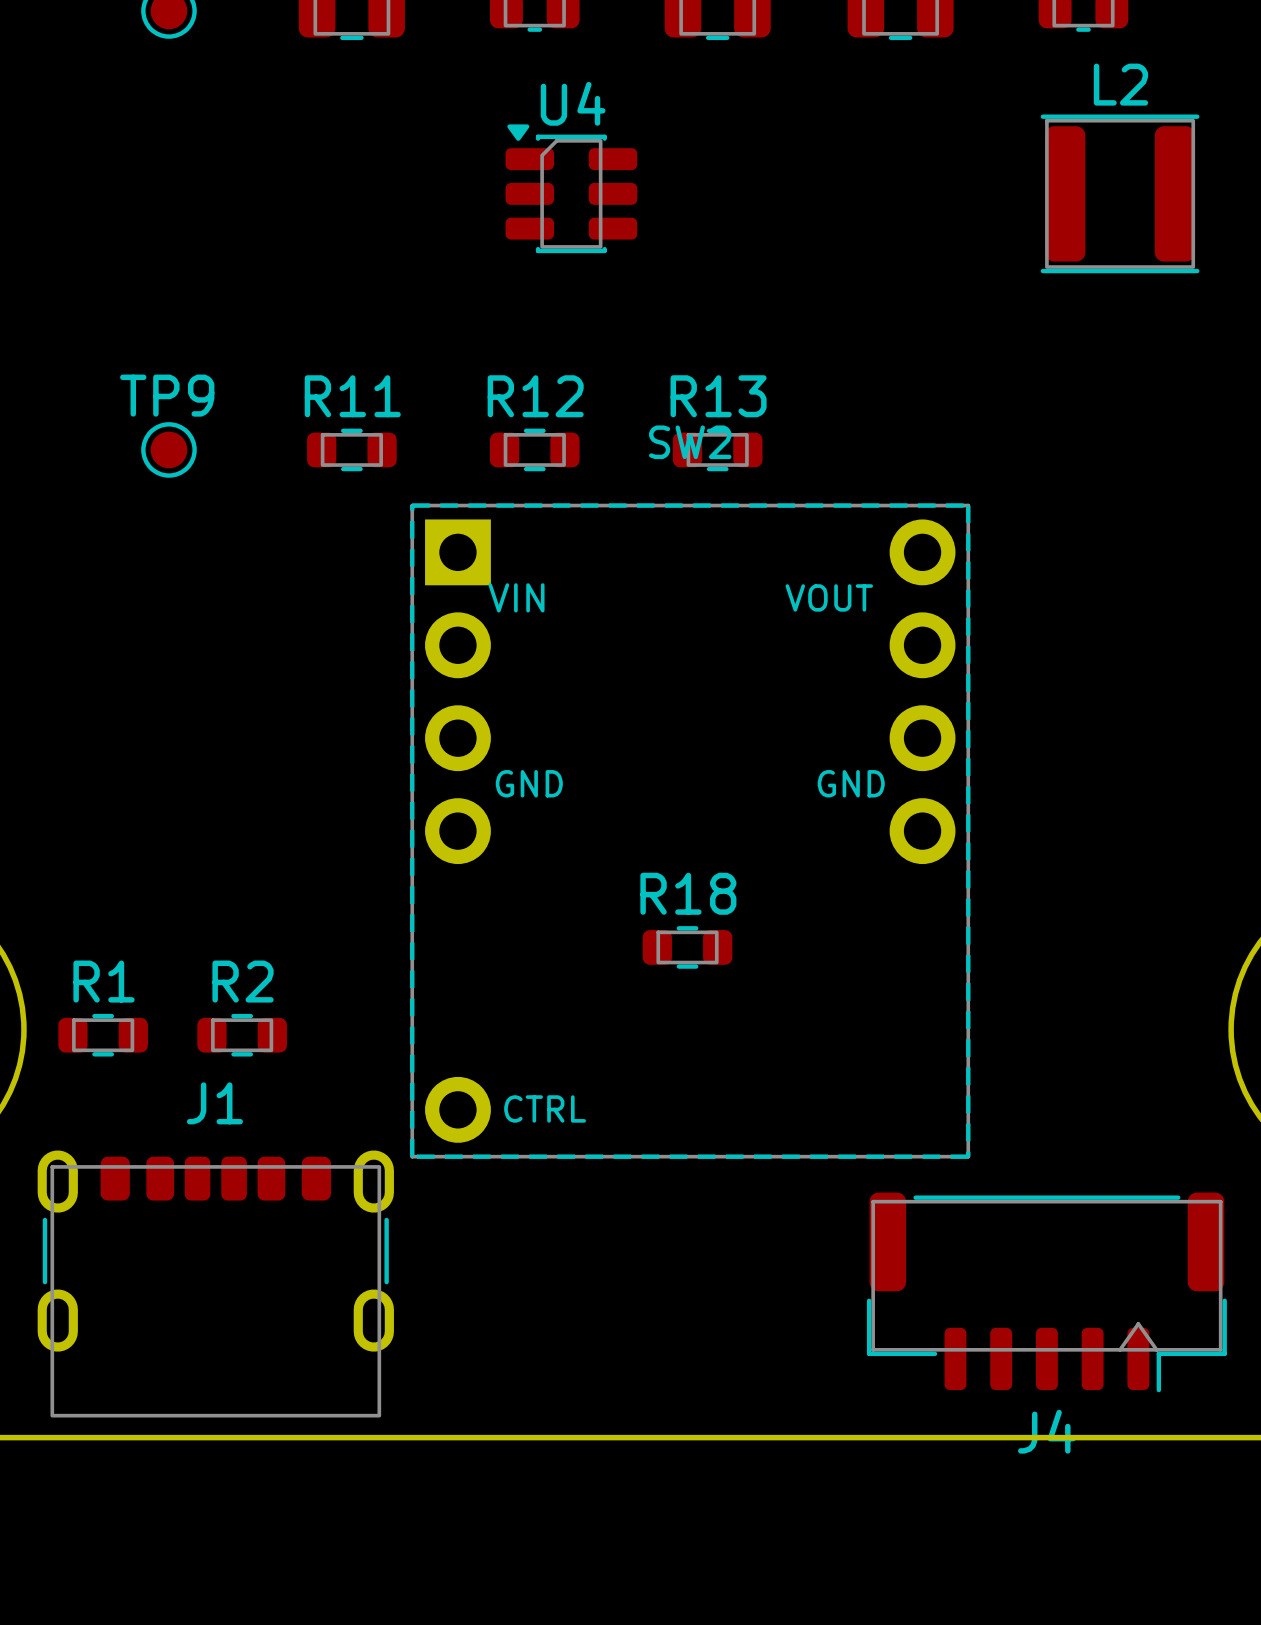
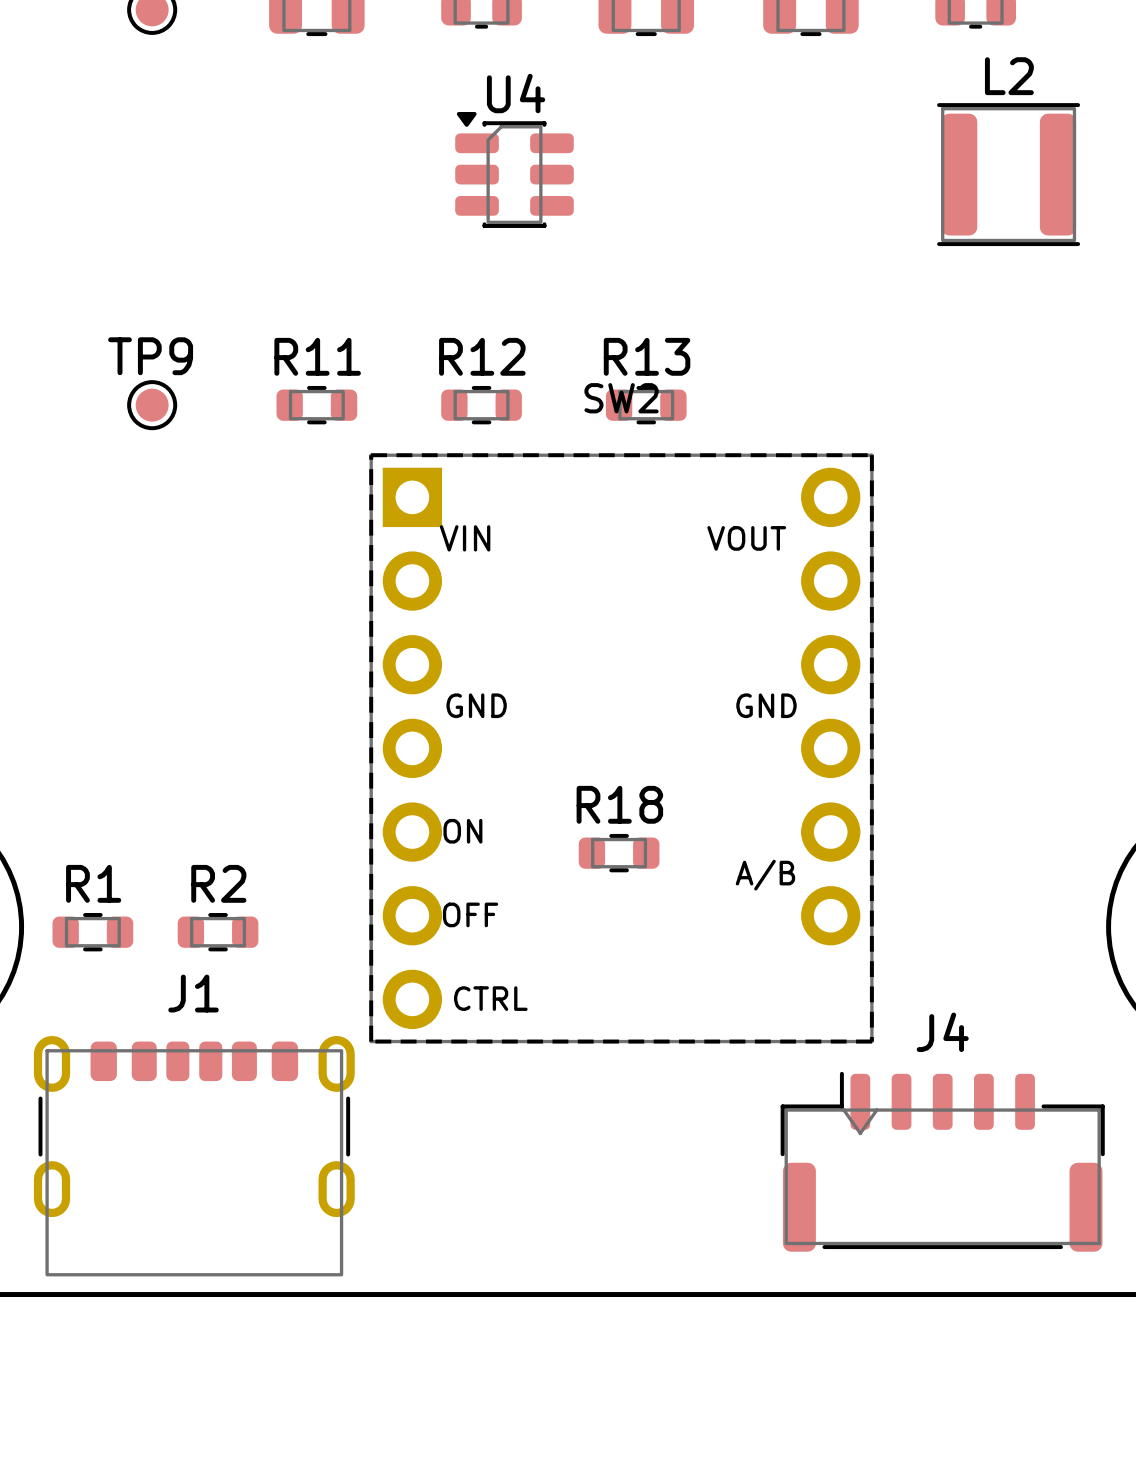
SW2 footprint: [410, 503, 971, 1159] -> [369, 453, 874, 1044]
J4 rotation: 0° (1046, 1292) -> 180° (942, 1161)

